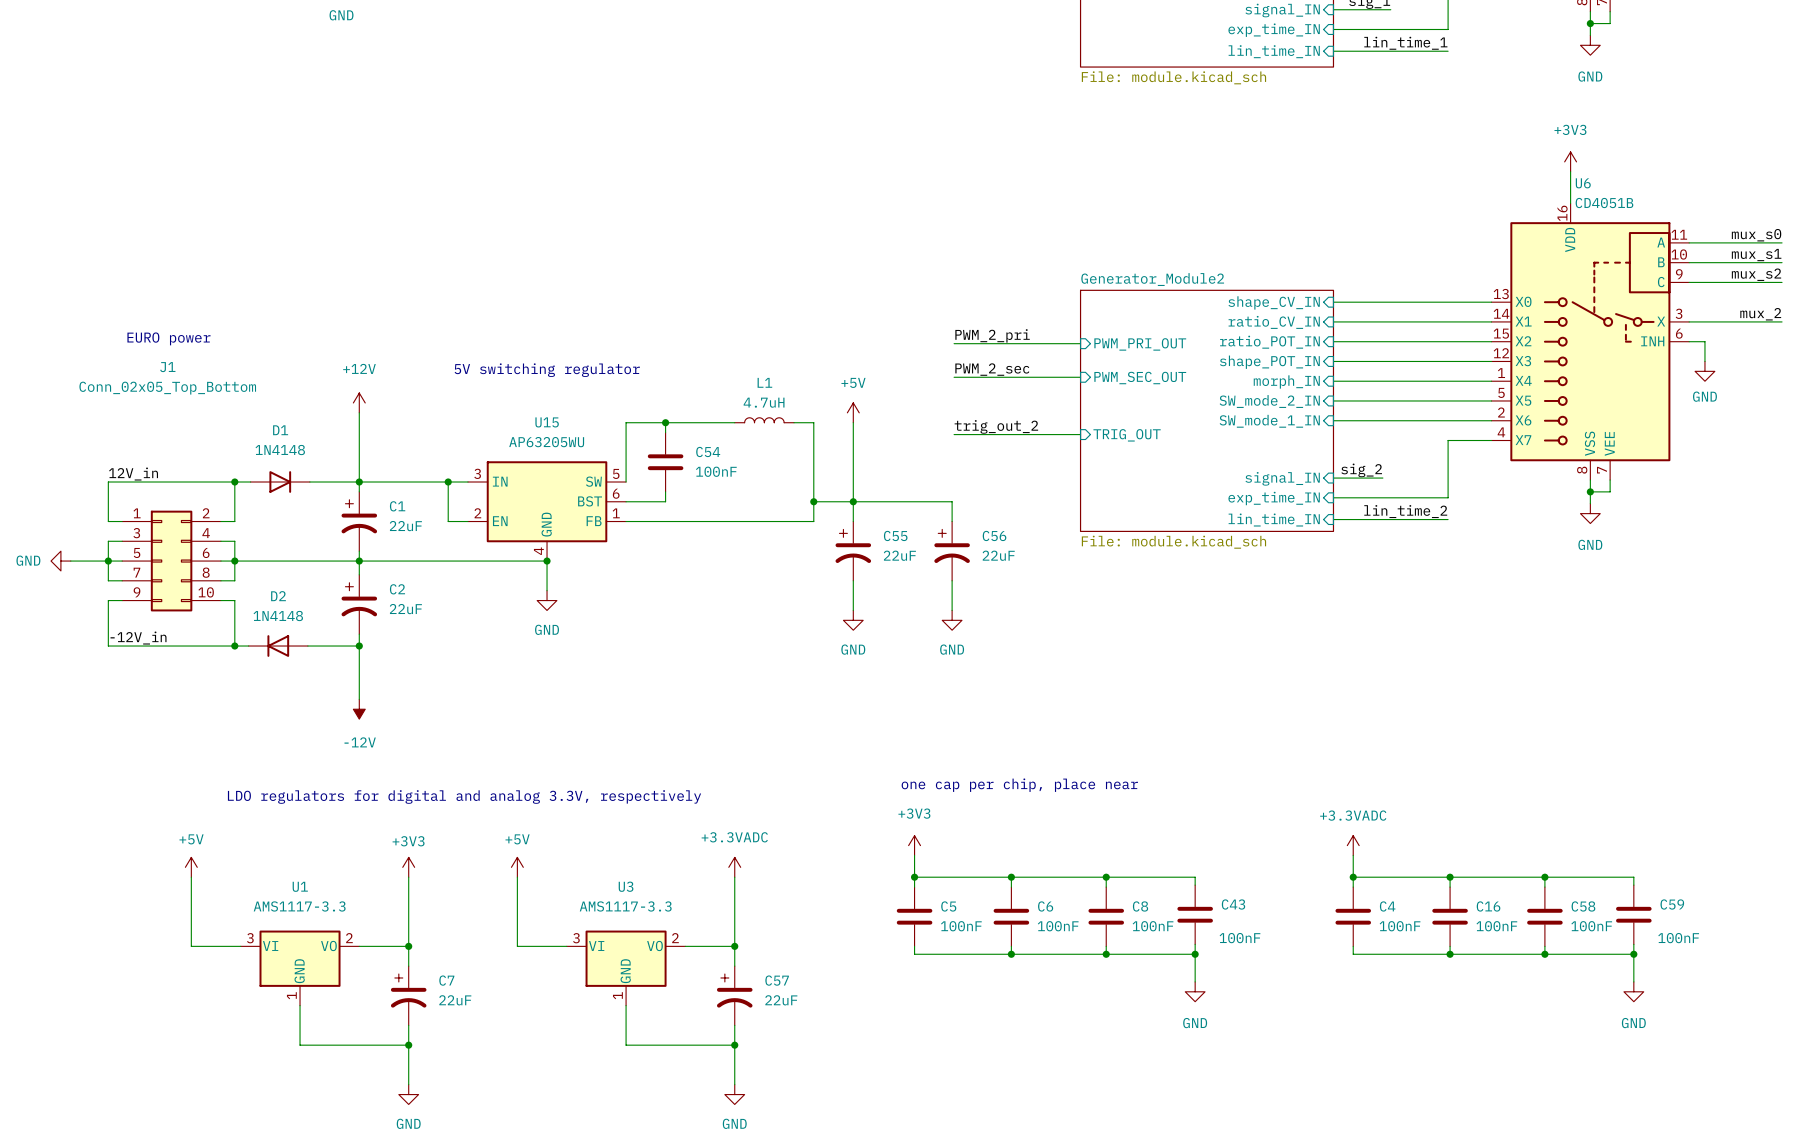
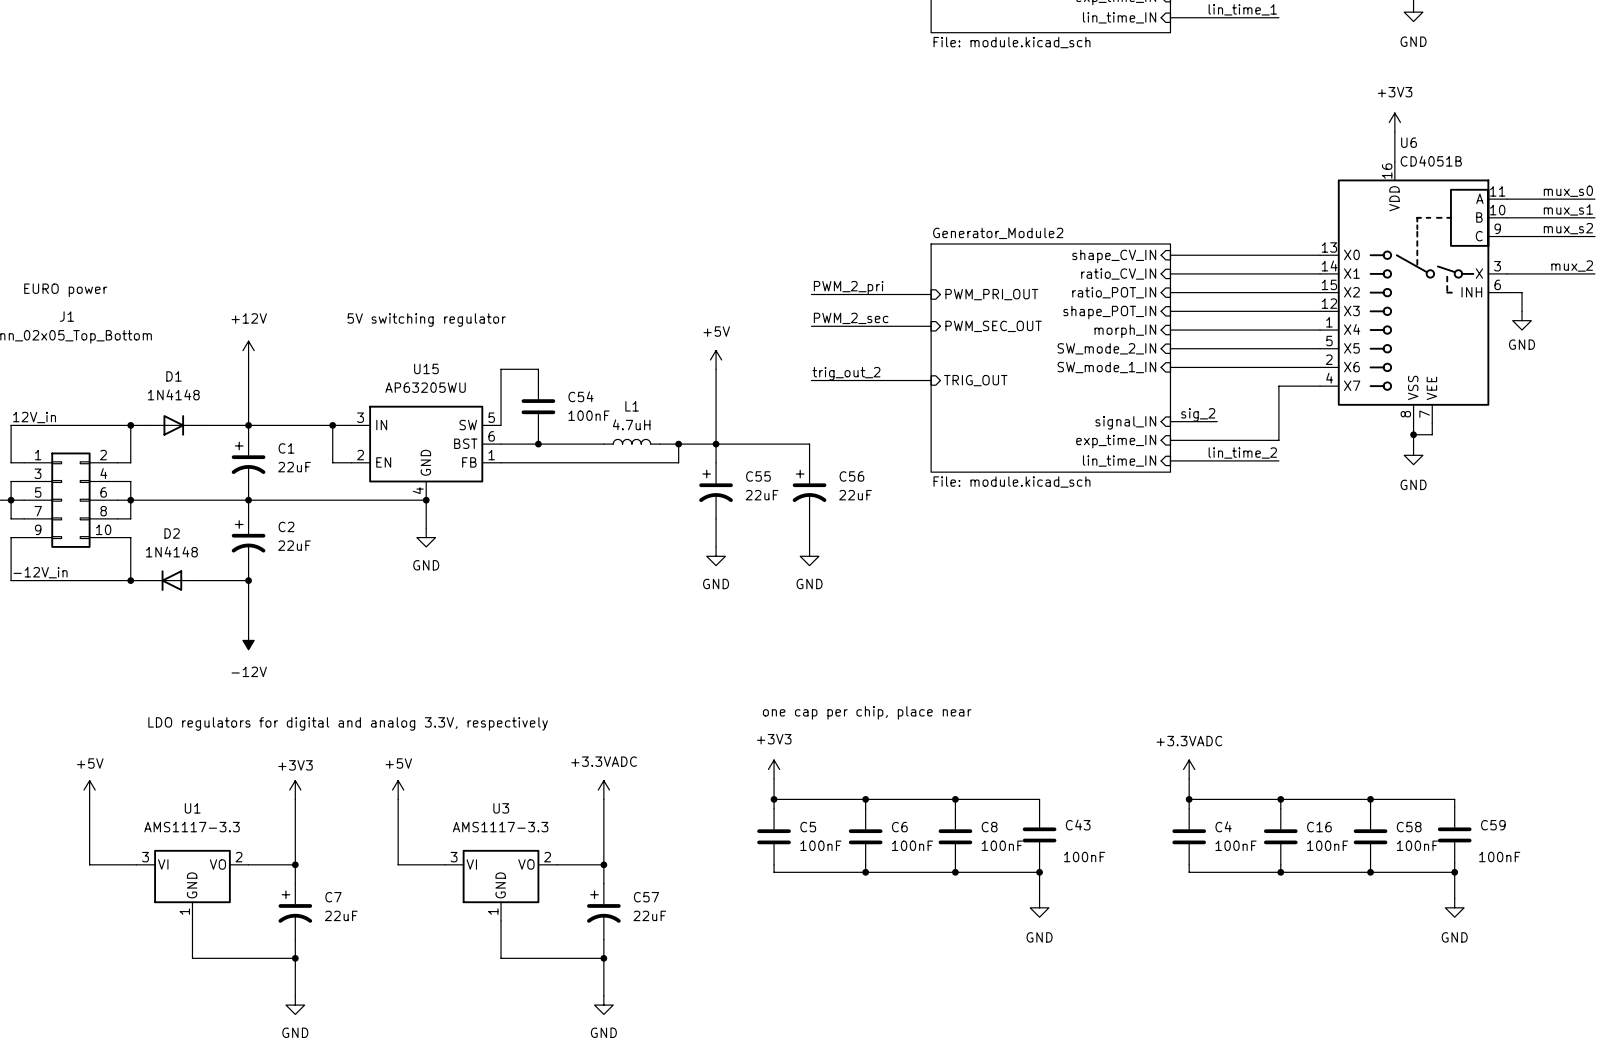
L1 position: (764, 420) -> (631, 441)
wire: (665, 422) (734, 422) -> (538, 444) (603, 444)
junction: (665, 422) -> none
wire: (794, 422) (813, 422) (813, 501) -> (659, 444) (678, 444)
junction: none -> (538, 444)

